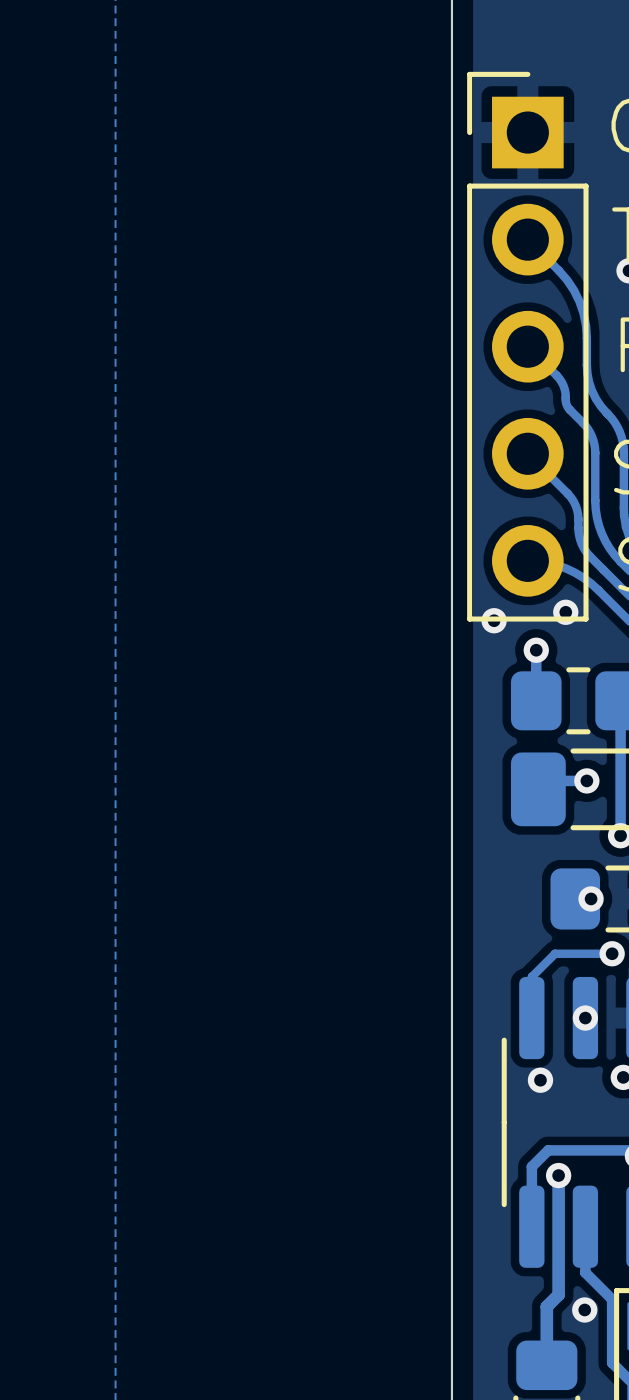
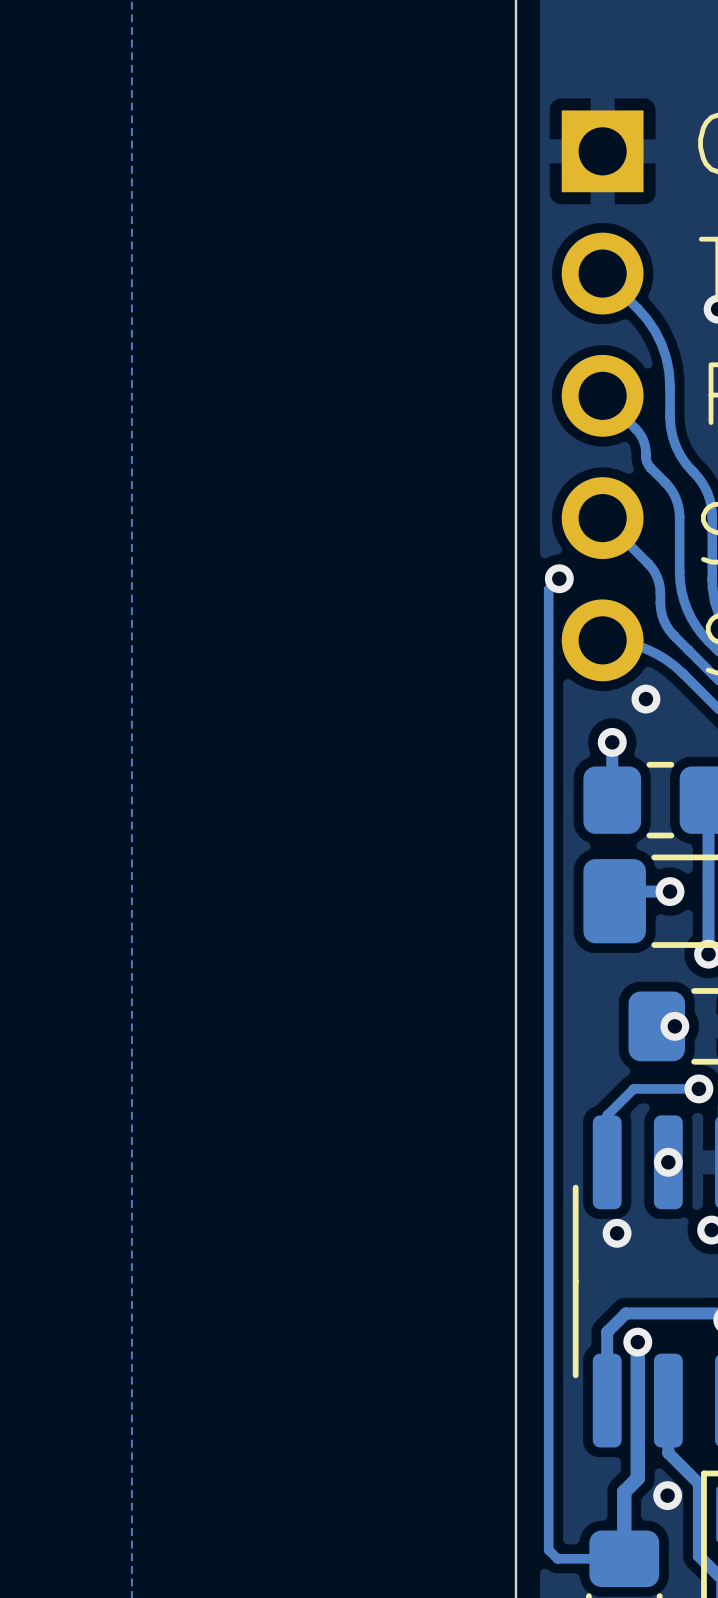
part side: bottom (527, 346) -> top (602, 395)
track: none -> (559, 578) (548, 589) (548, 1549) (557, 1558) (624, 1558)
via position: (494, 620) -> (559, 578)

